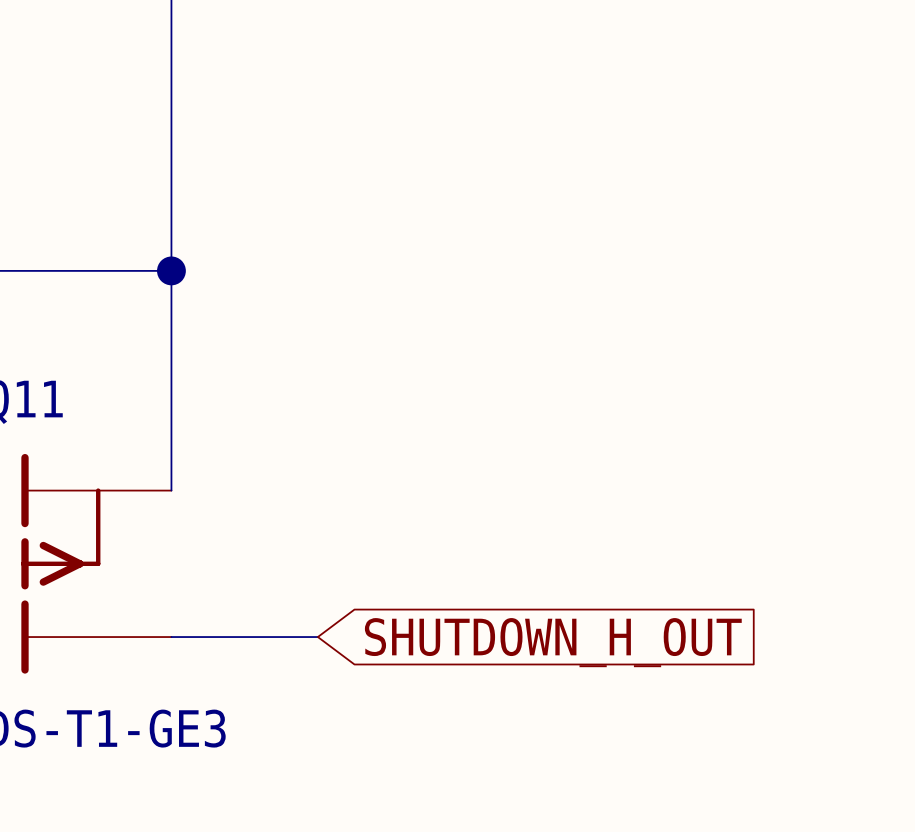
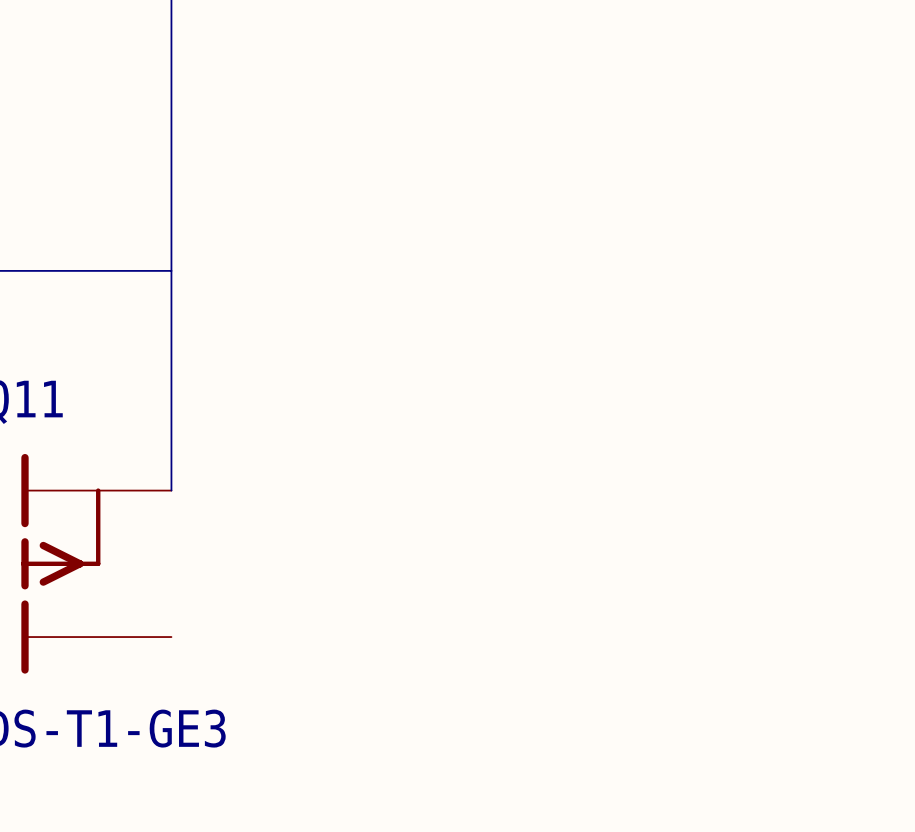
junction: (171, 270) -> none
wire: (171, 637) (317, 637) -> none
global label: SHUTDOWN_H_OUT (553, 642) -> none

